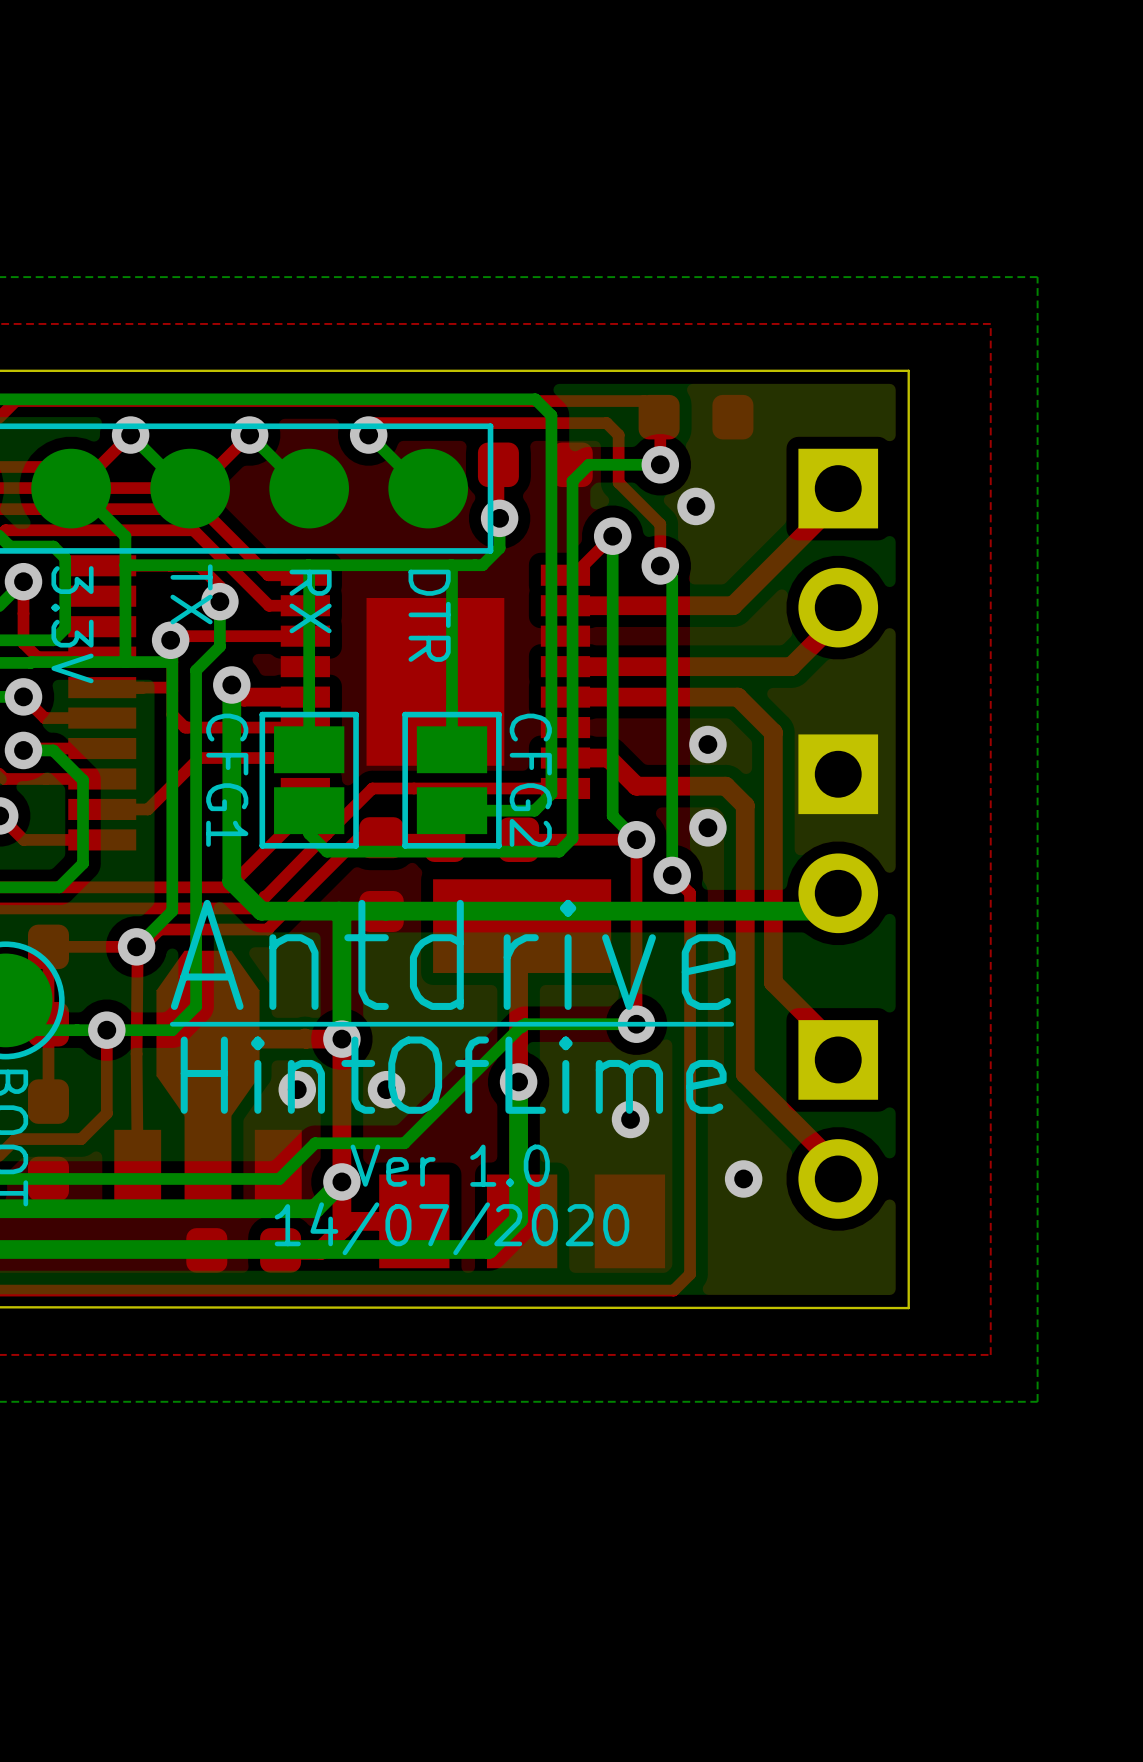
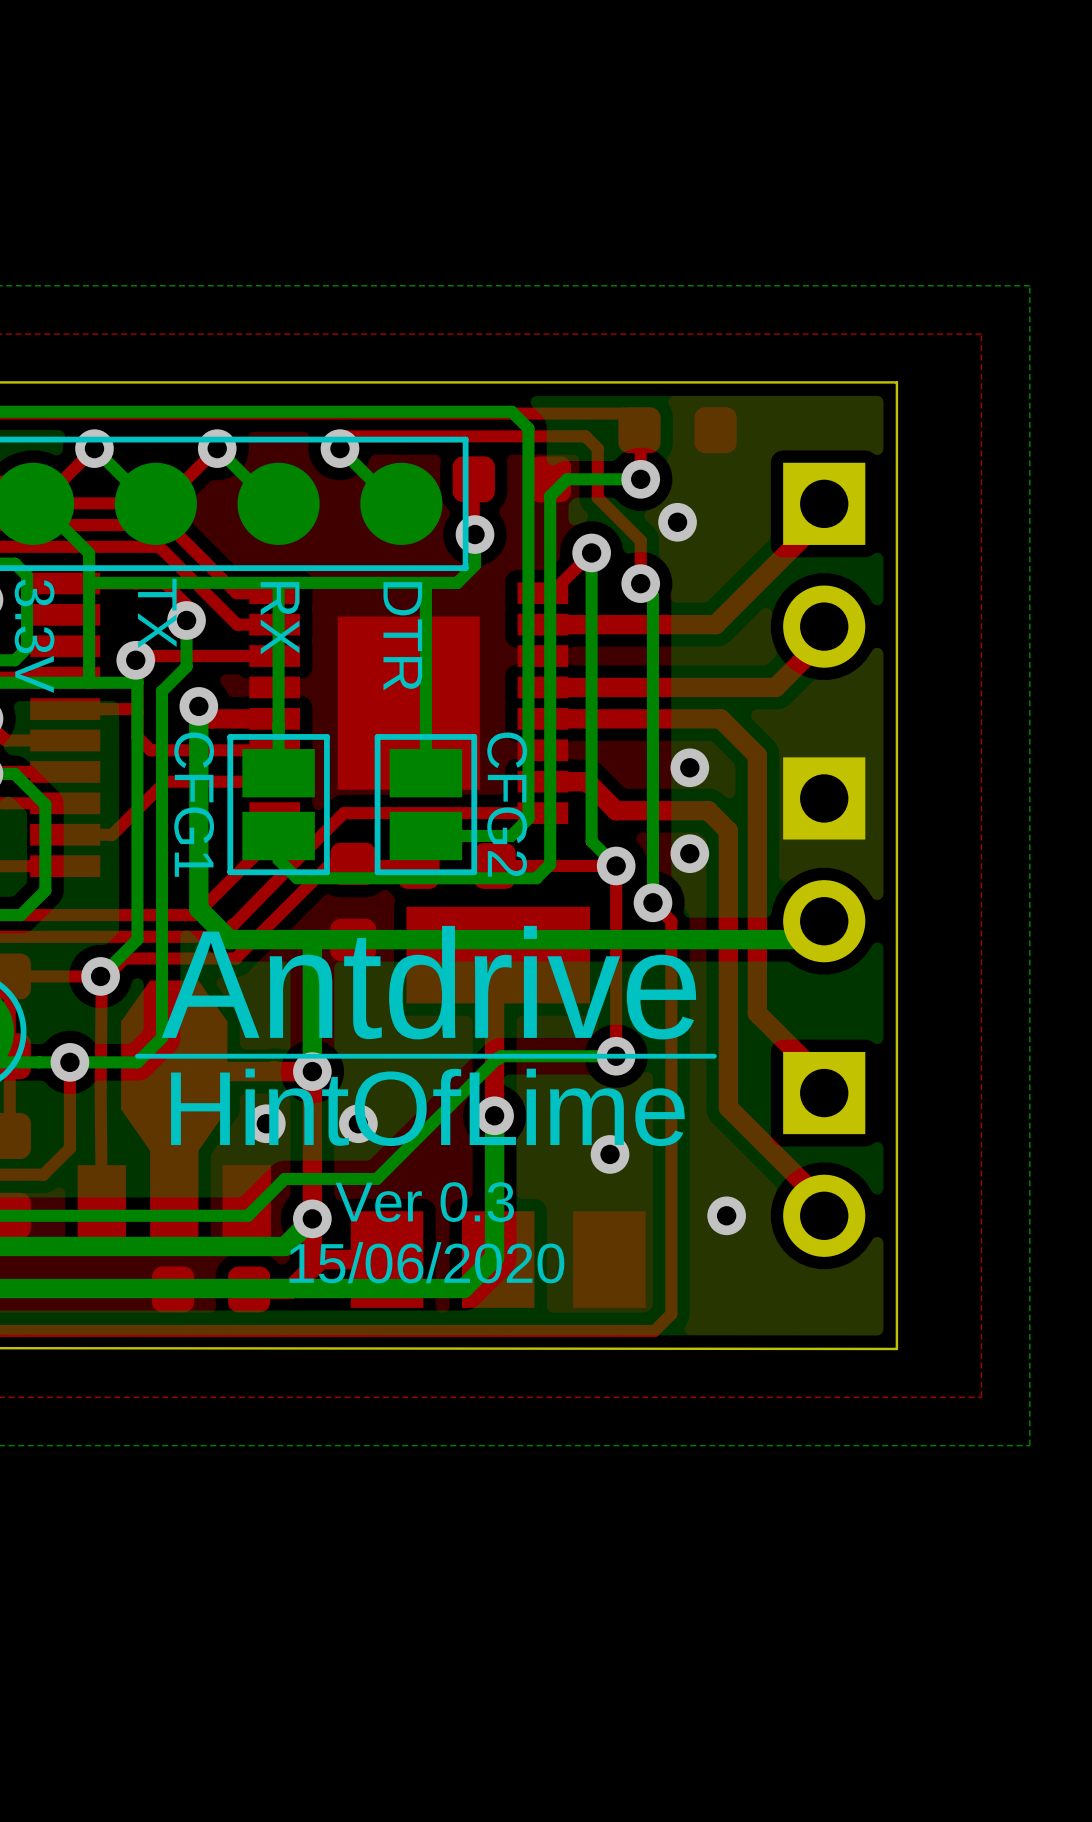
text: Ver 1.0 (450, 1165) -> Ver 0.3 (424, 1202)
text: 14/07/2020 (452, 1228) -> 15/06/2020 (426, 1262)

